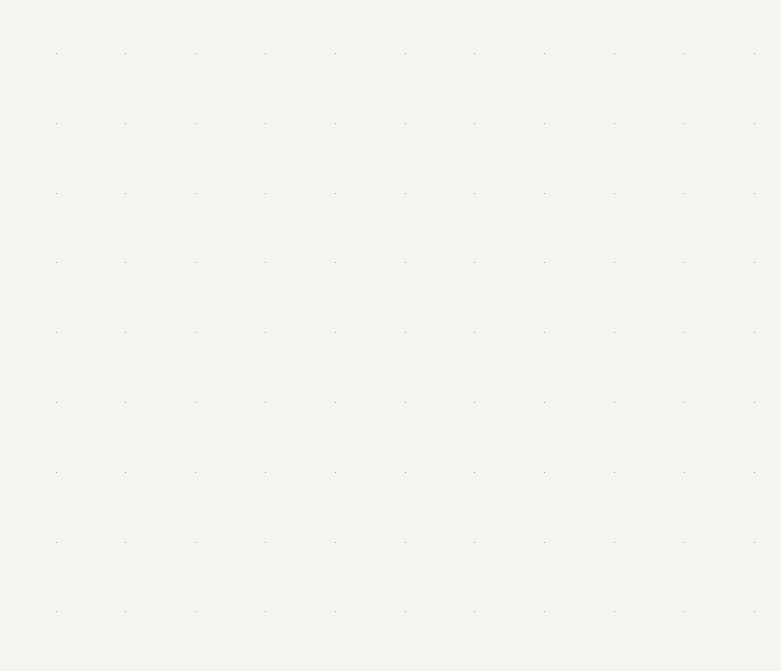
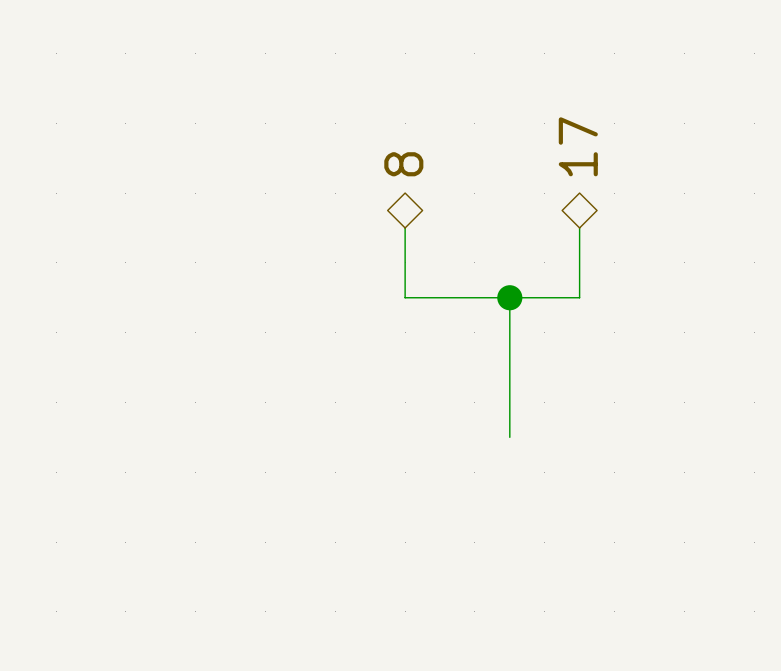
hierarchical label: none -> 17 (578, 146)
hierarchical label: none -> 8 (403, 164)
wire: none -> (405, 227) (405, 297) (579, 297) (579, 227)
wire: none -> (509, 297) (509, 437)
junction: none -> (509, 297)

